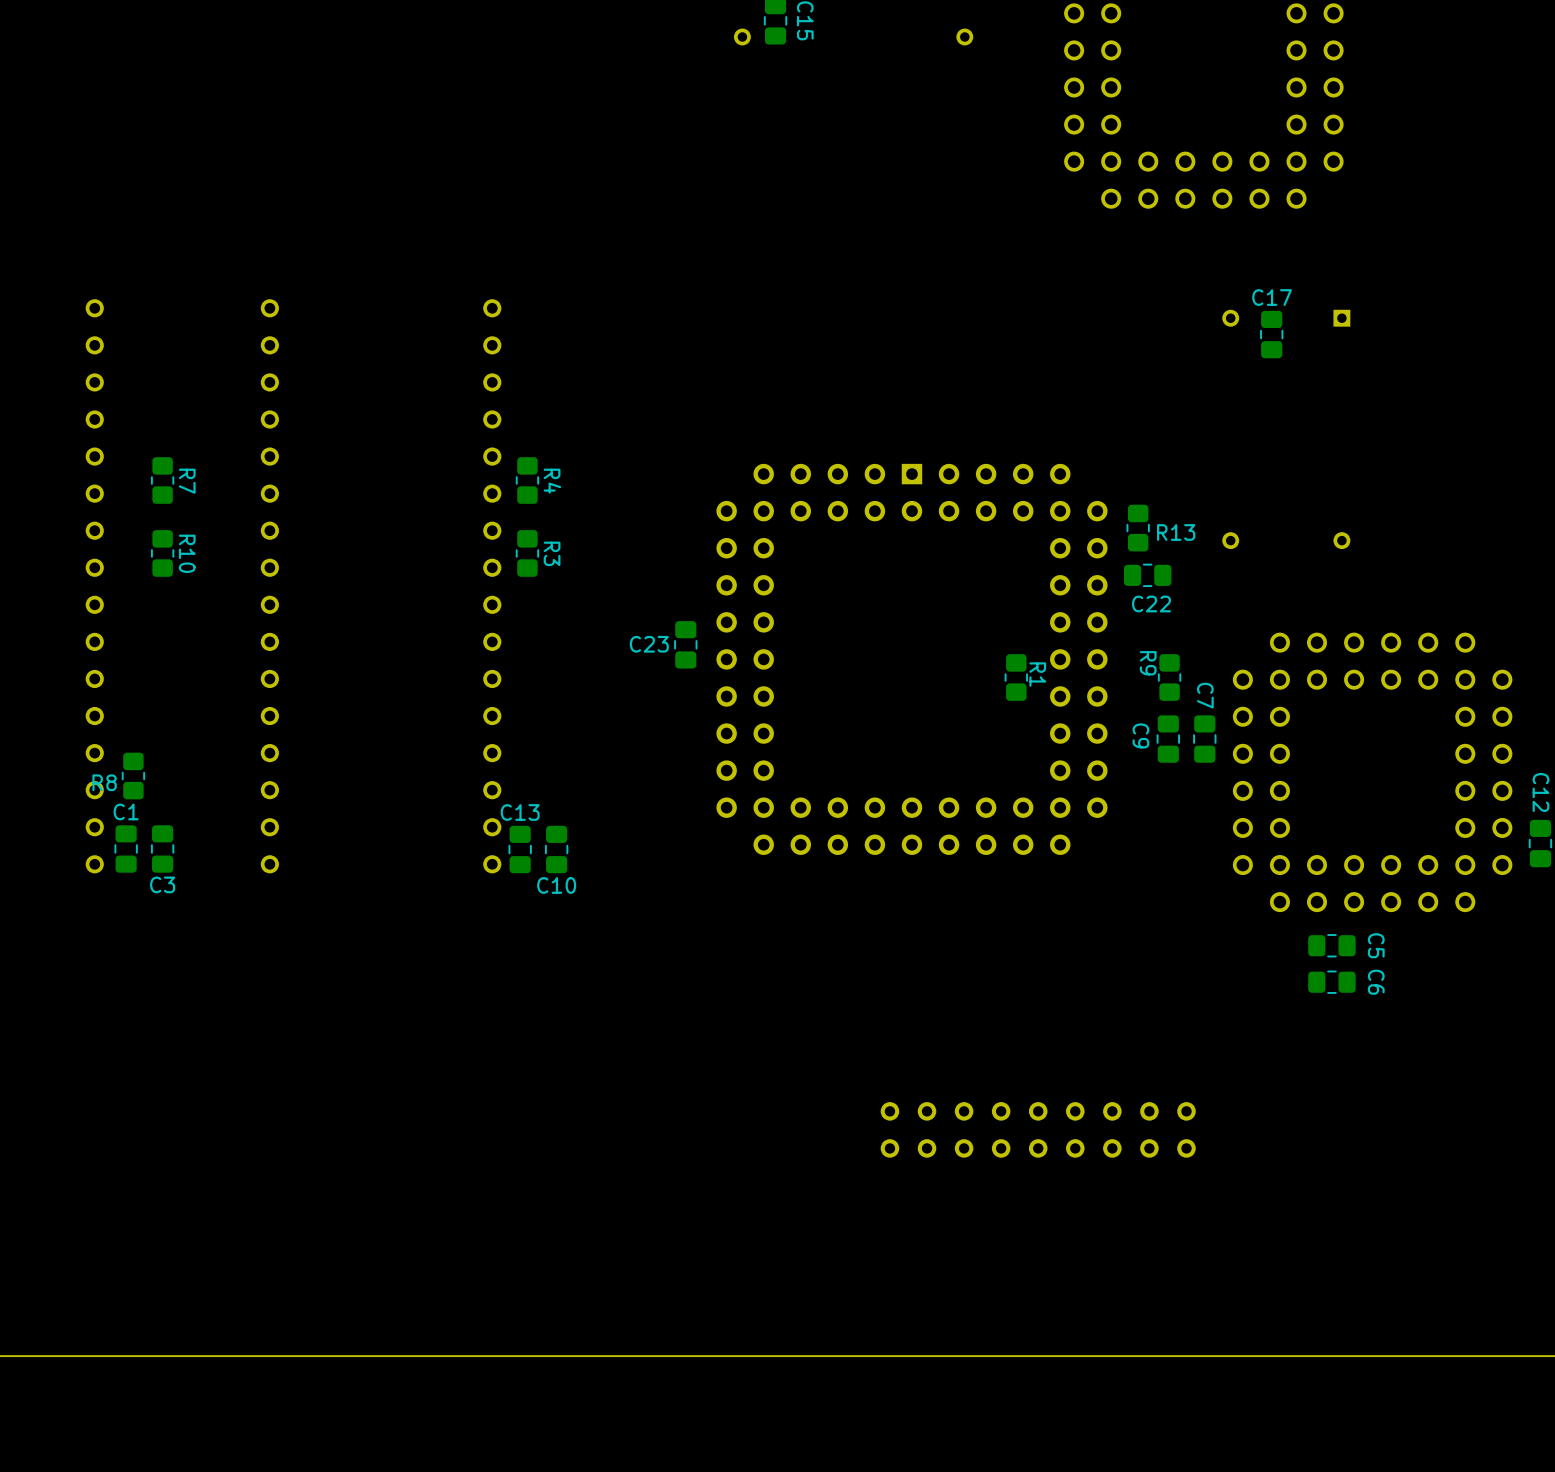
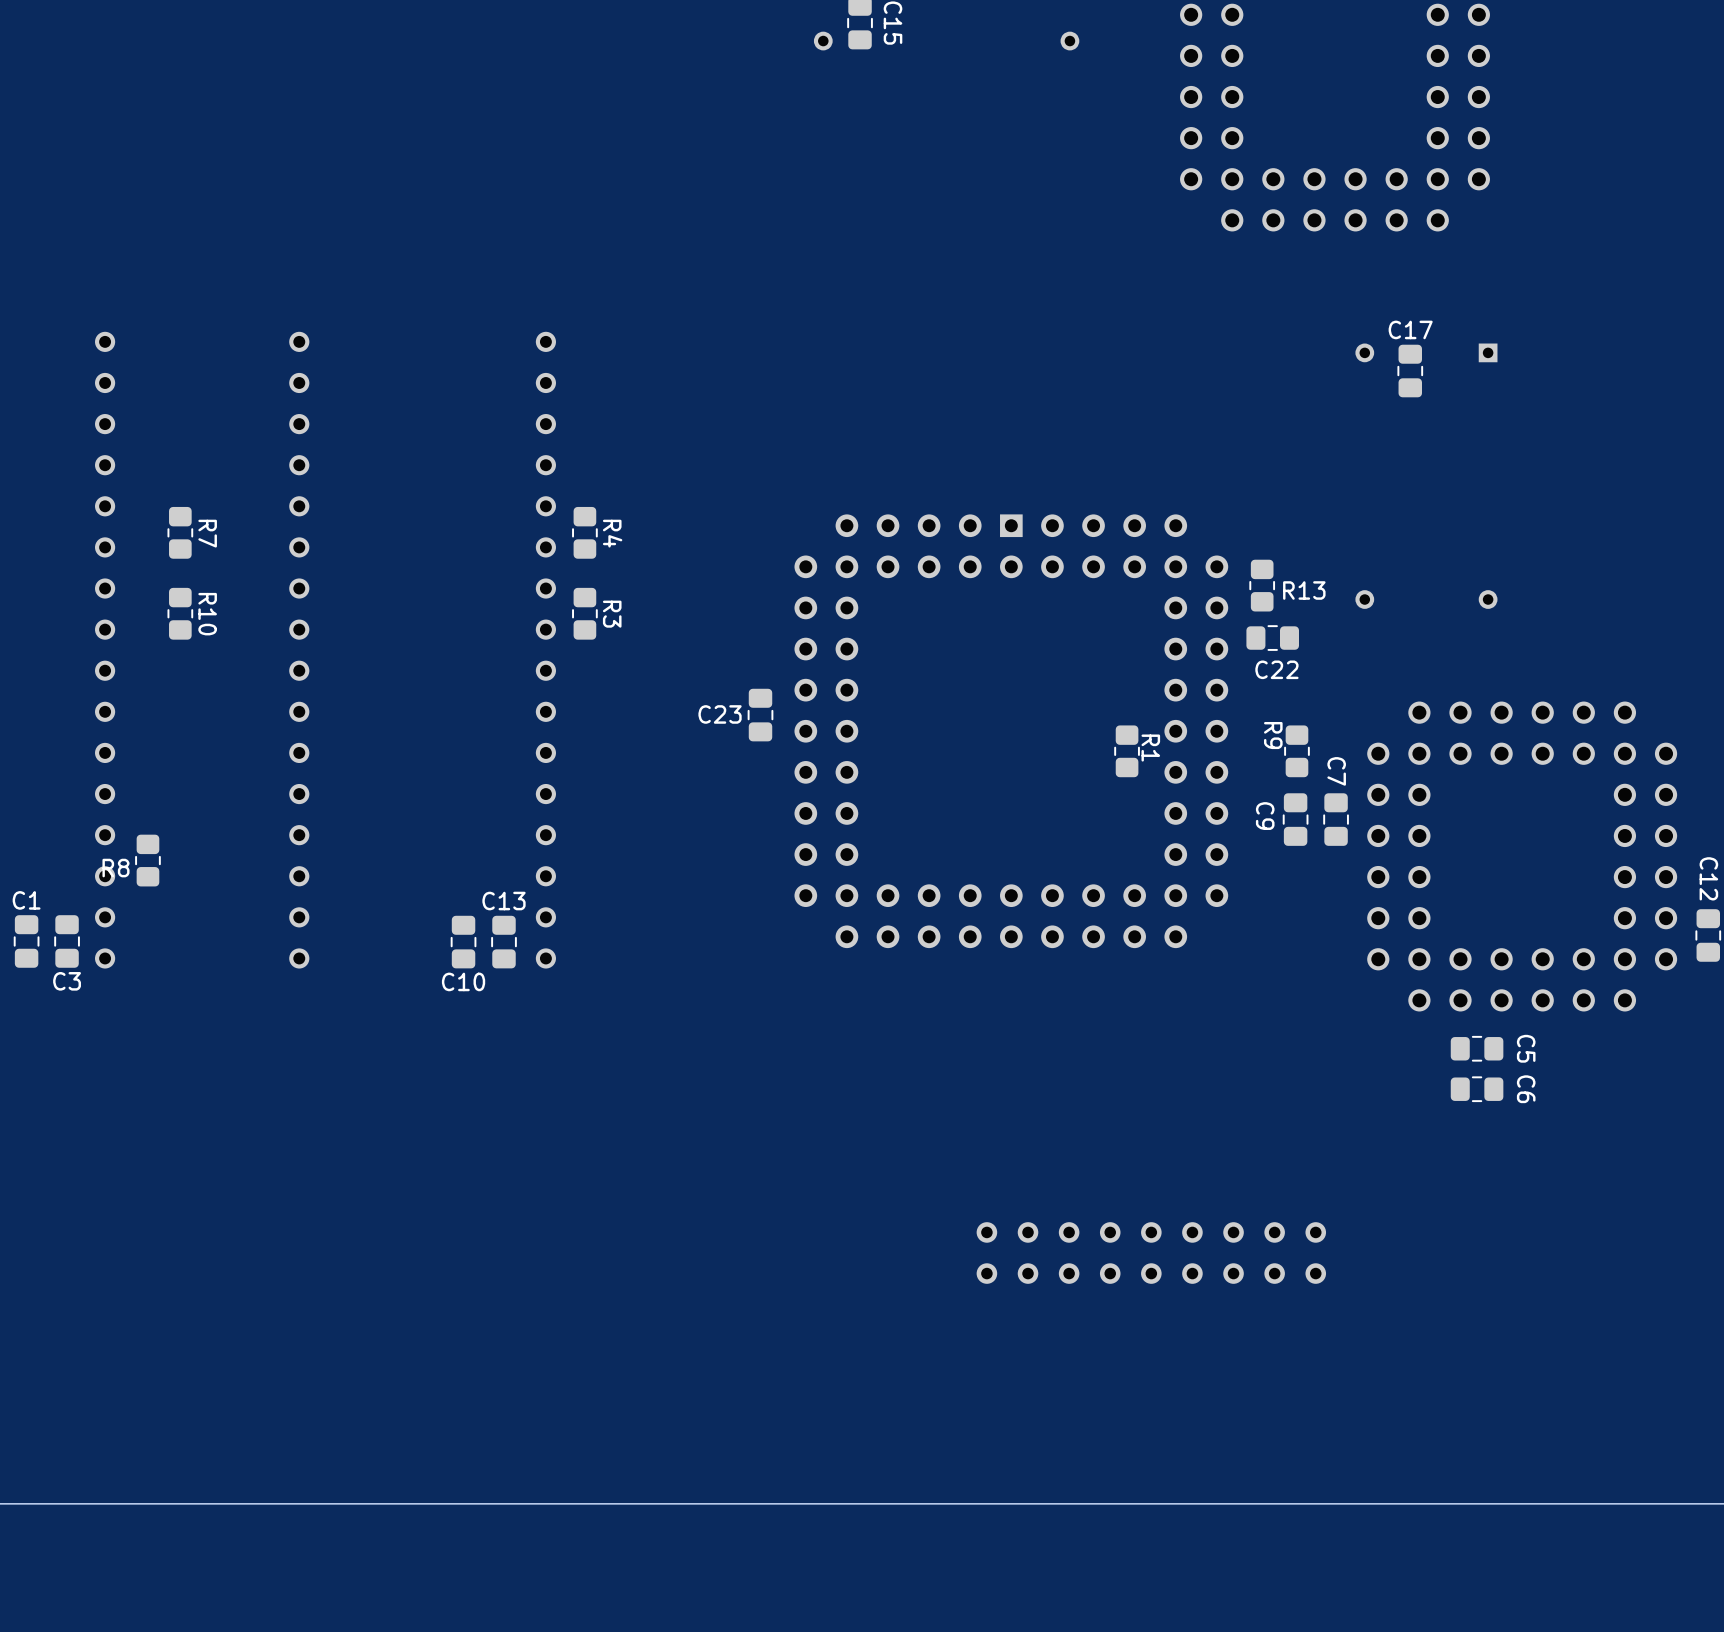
C1 position: (126, 848) -> (26, 941)
C3 position: (162, 848) -> (67, 941)
C13 position: (520, 849) -> (504, 942)
C10 position: (556, 849) -> (463, 942)

